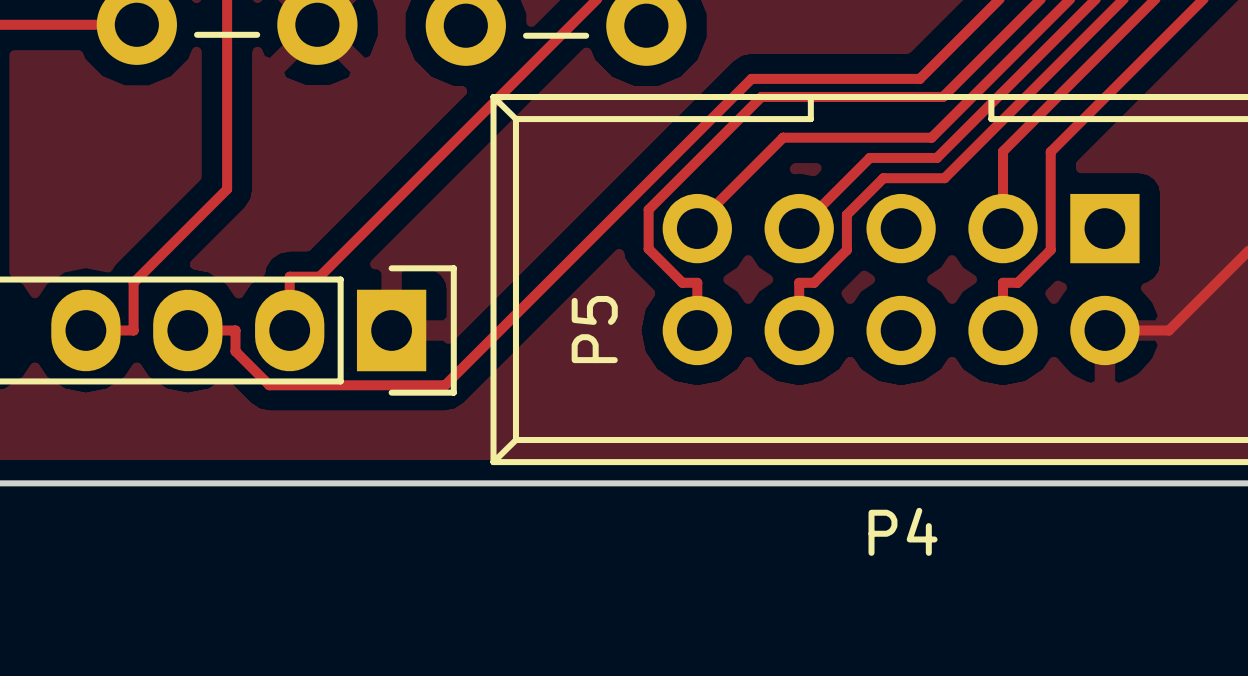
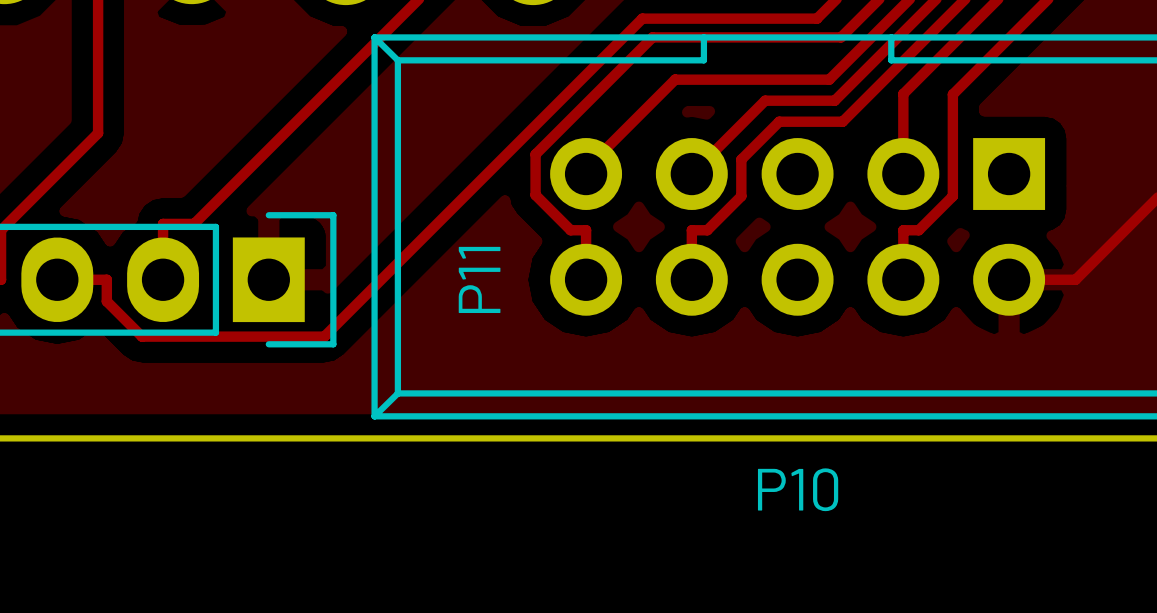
P5 name: P5 (594, 329) -> P11 (479, 279)
P4 name: P4 (903, 531) -> P10 (798, 489)

